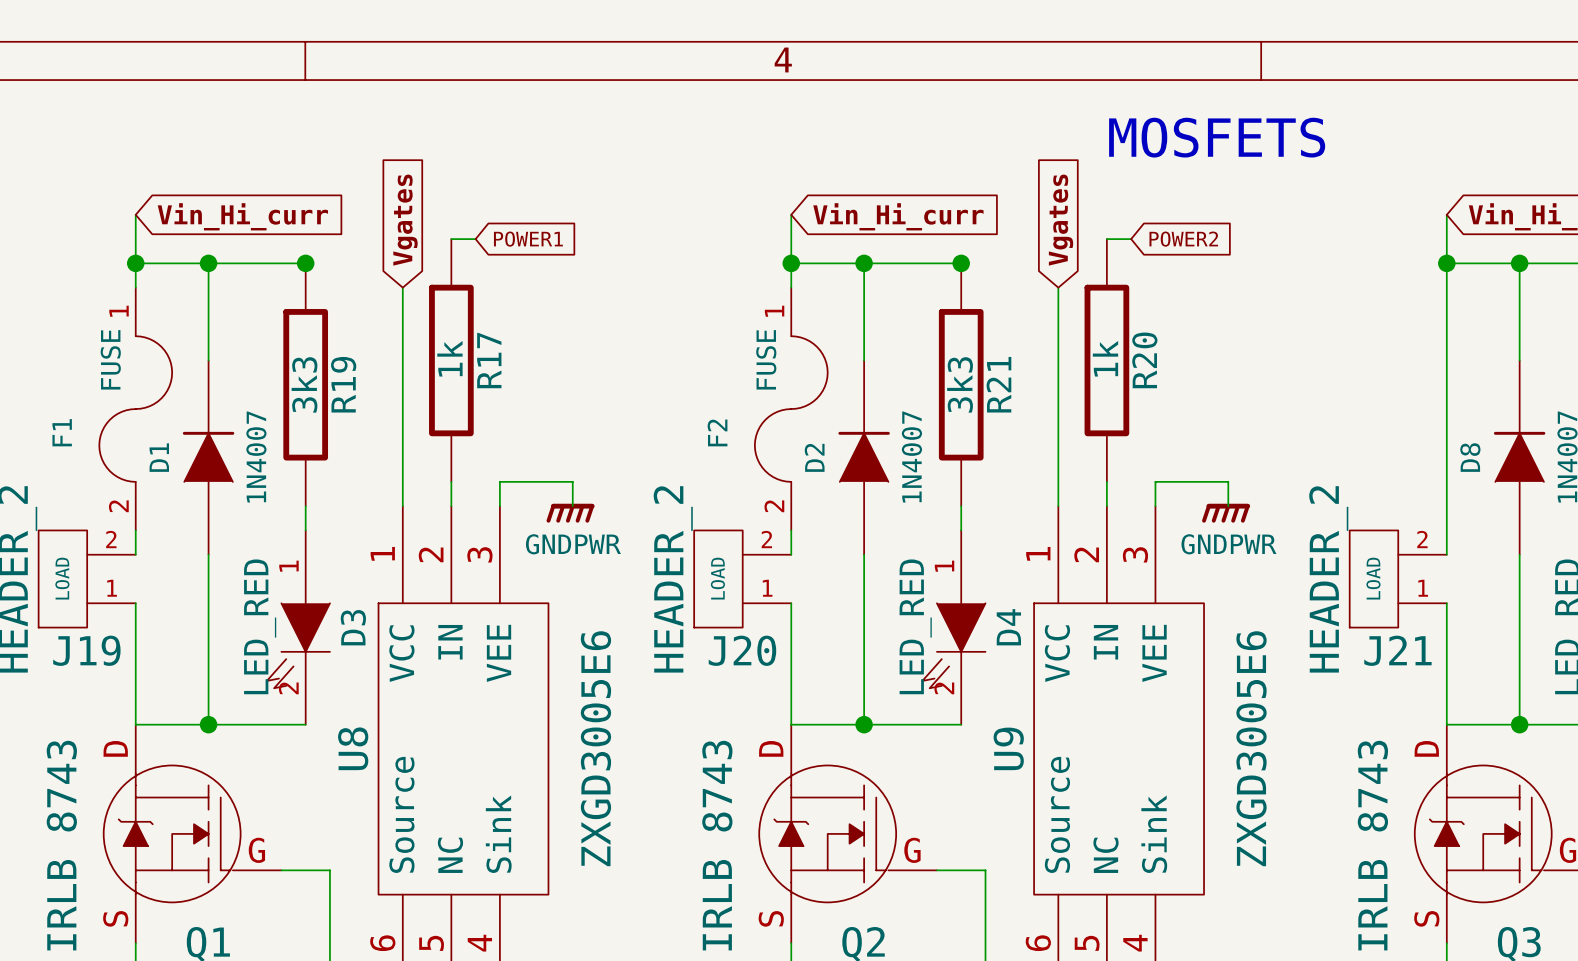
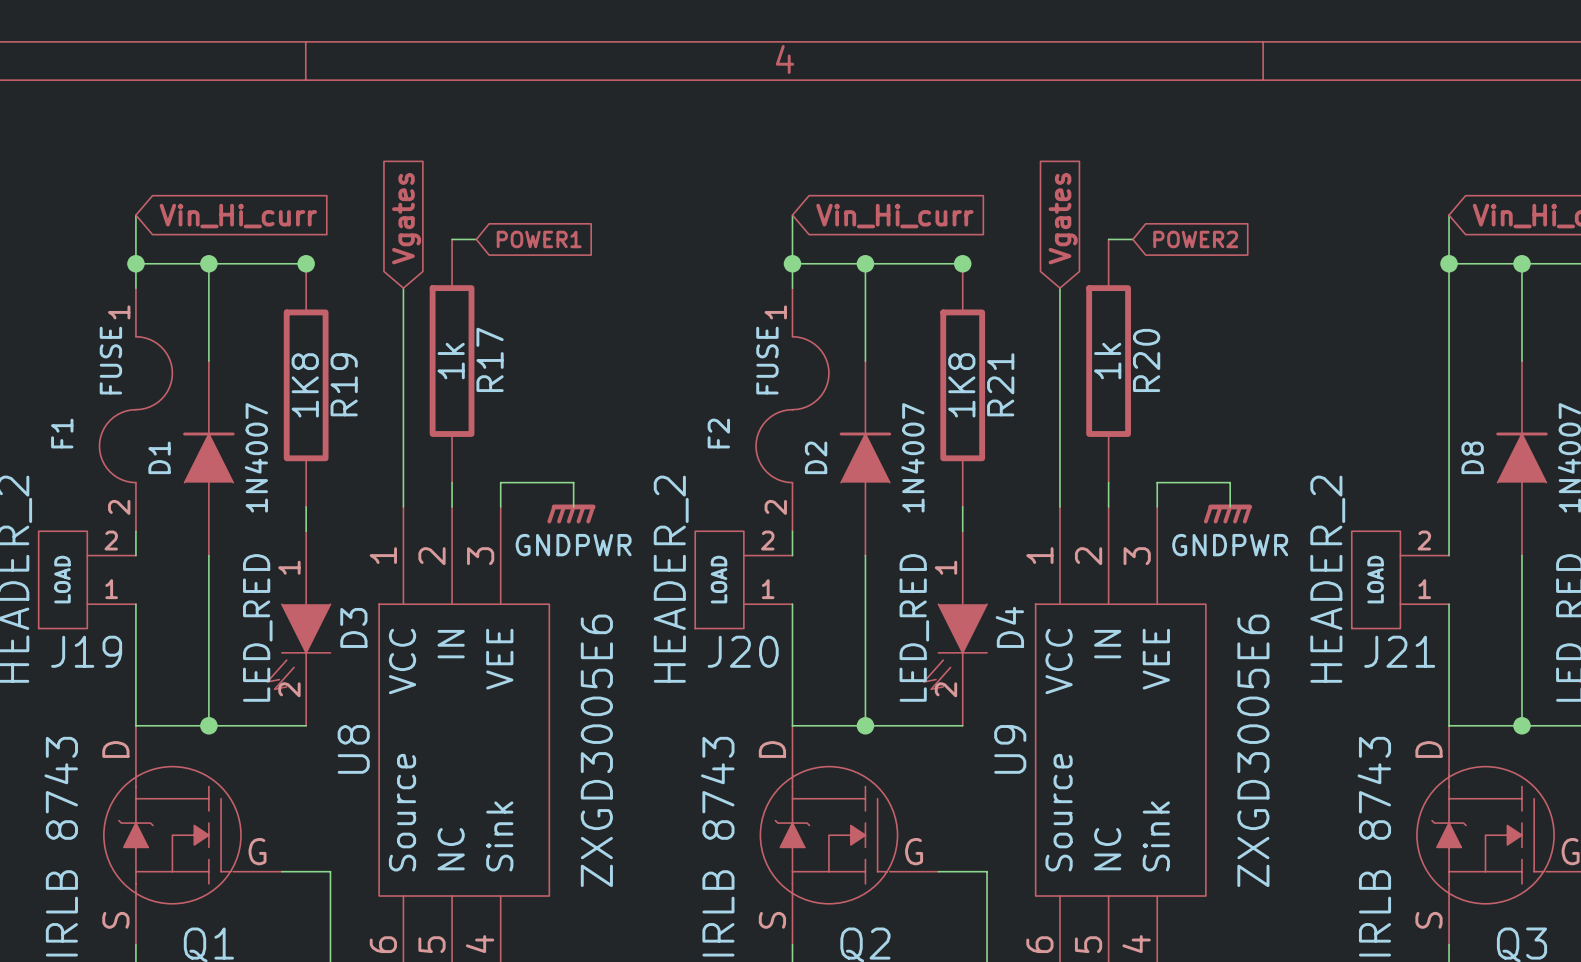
text: MOSFETS (1217, 137) -> none
R19 value: 3k3 (304, 384) -> 1K8 (305, 385)
R21 value: 3k3 (960, 384) -> 1K8 (961, 385)

